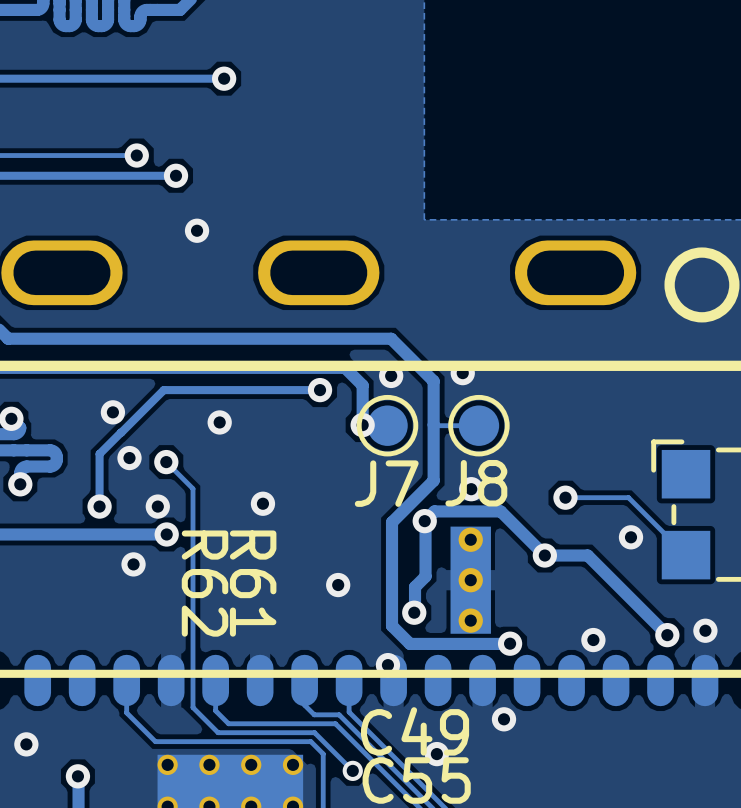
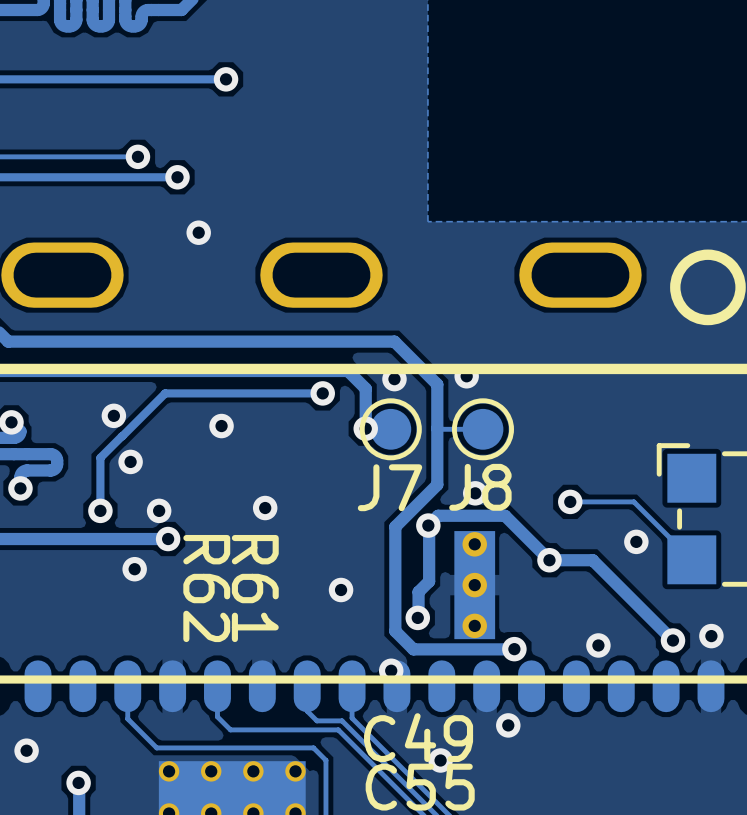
track: (166, 462) (192, 488) (192, 707) (218, 732) (314, 732) (352, 770) -> none
via: (166, 462) -> none
via: (352, 770) -> none

